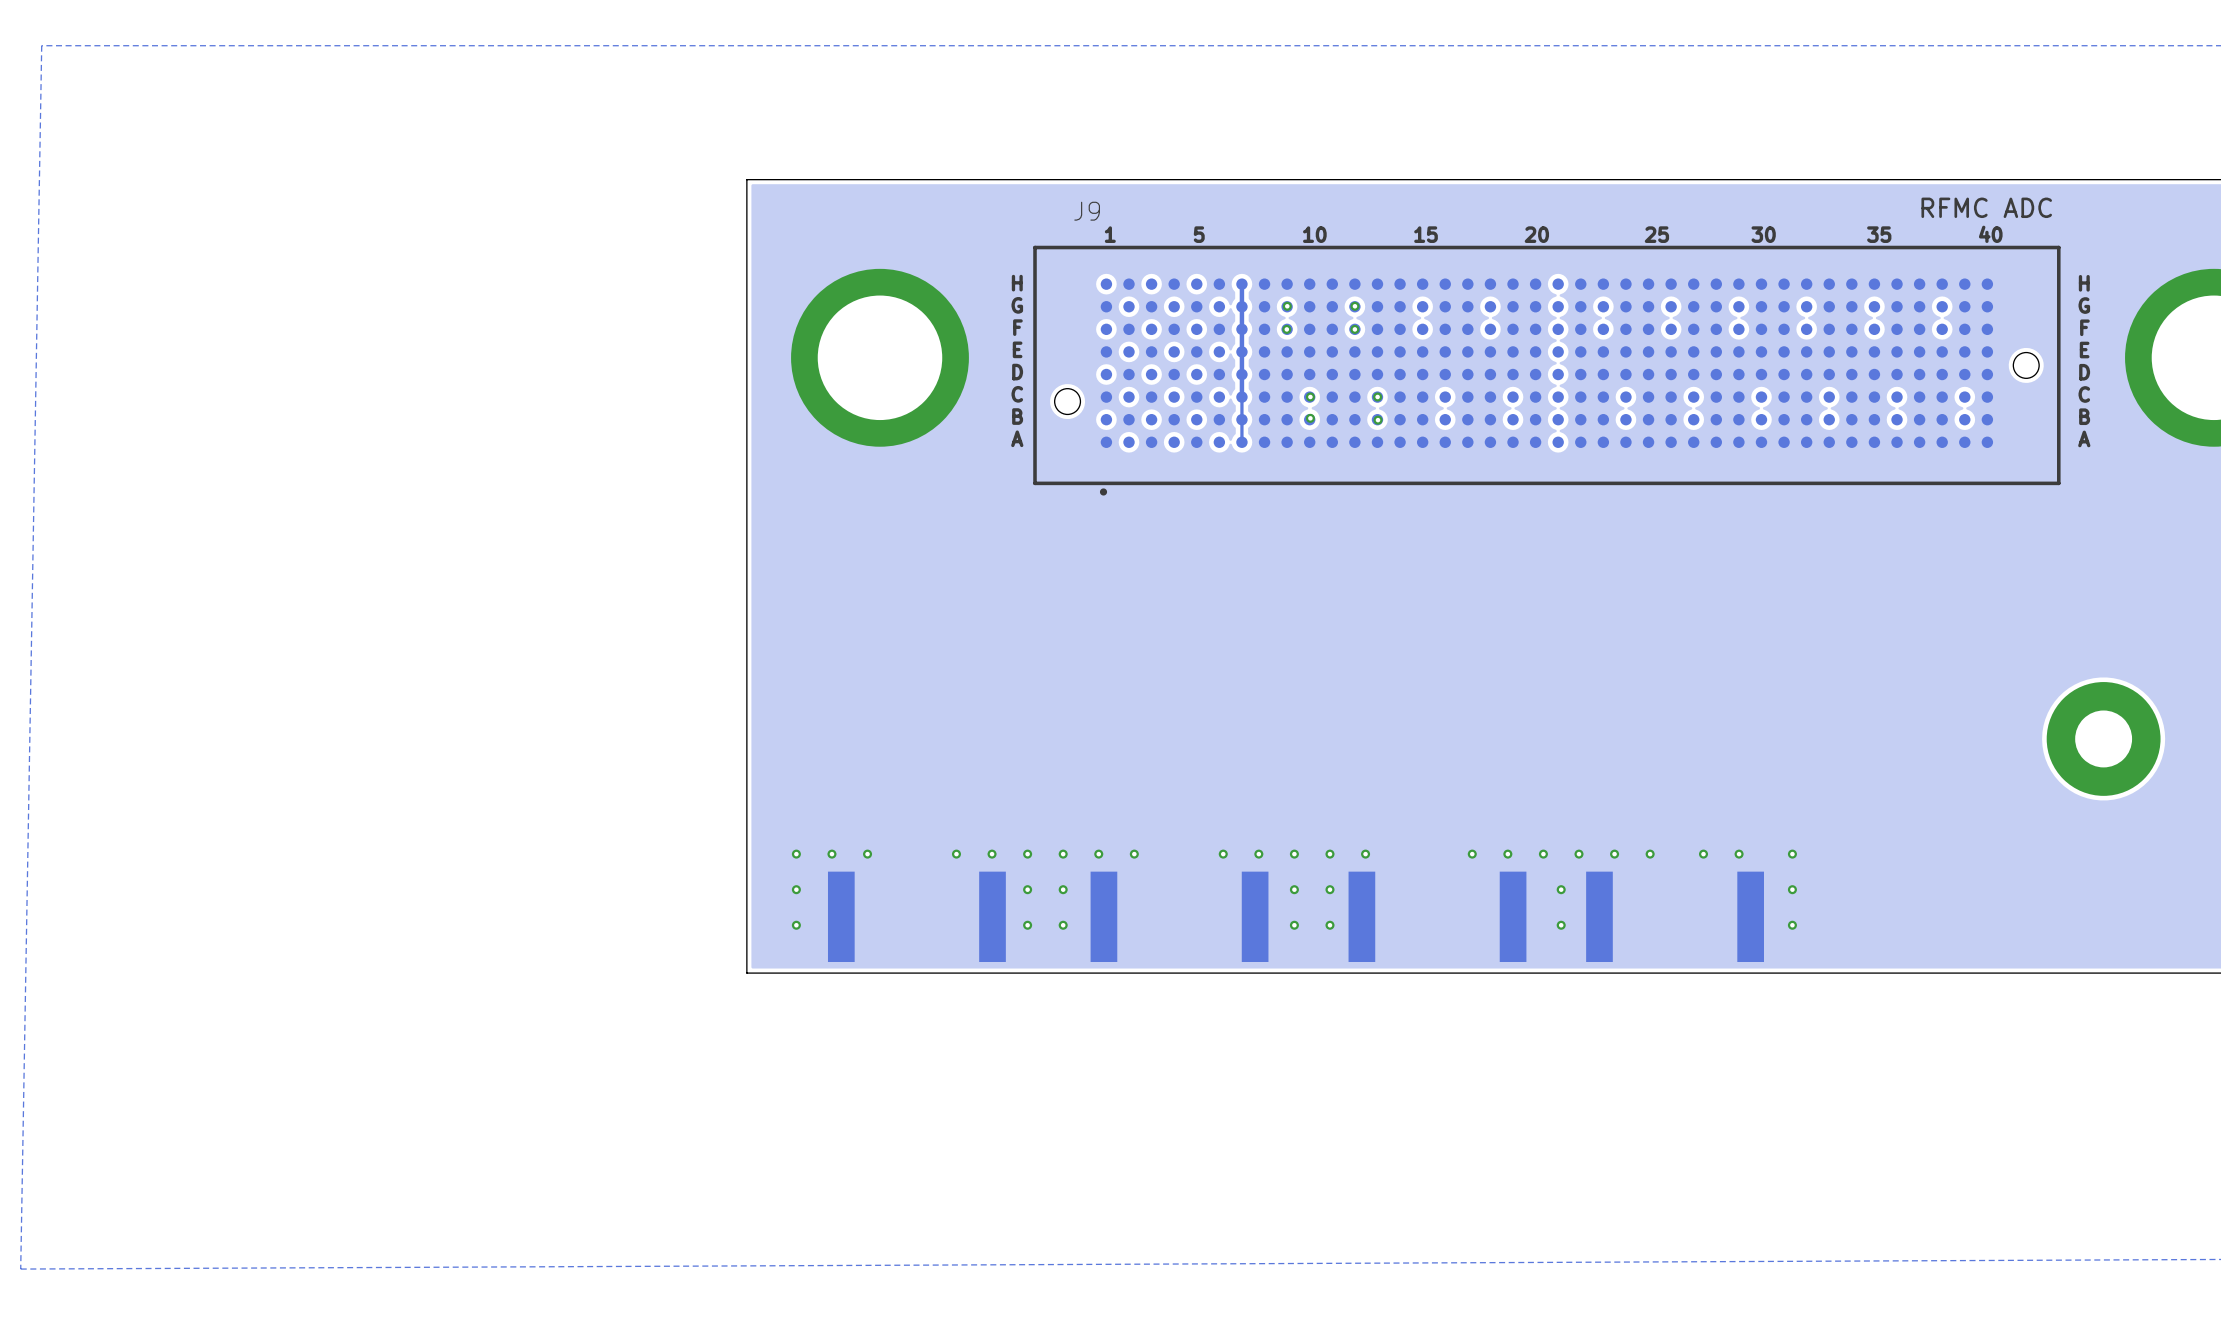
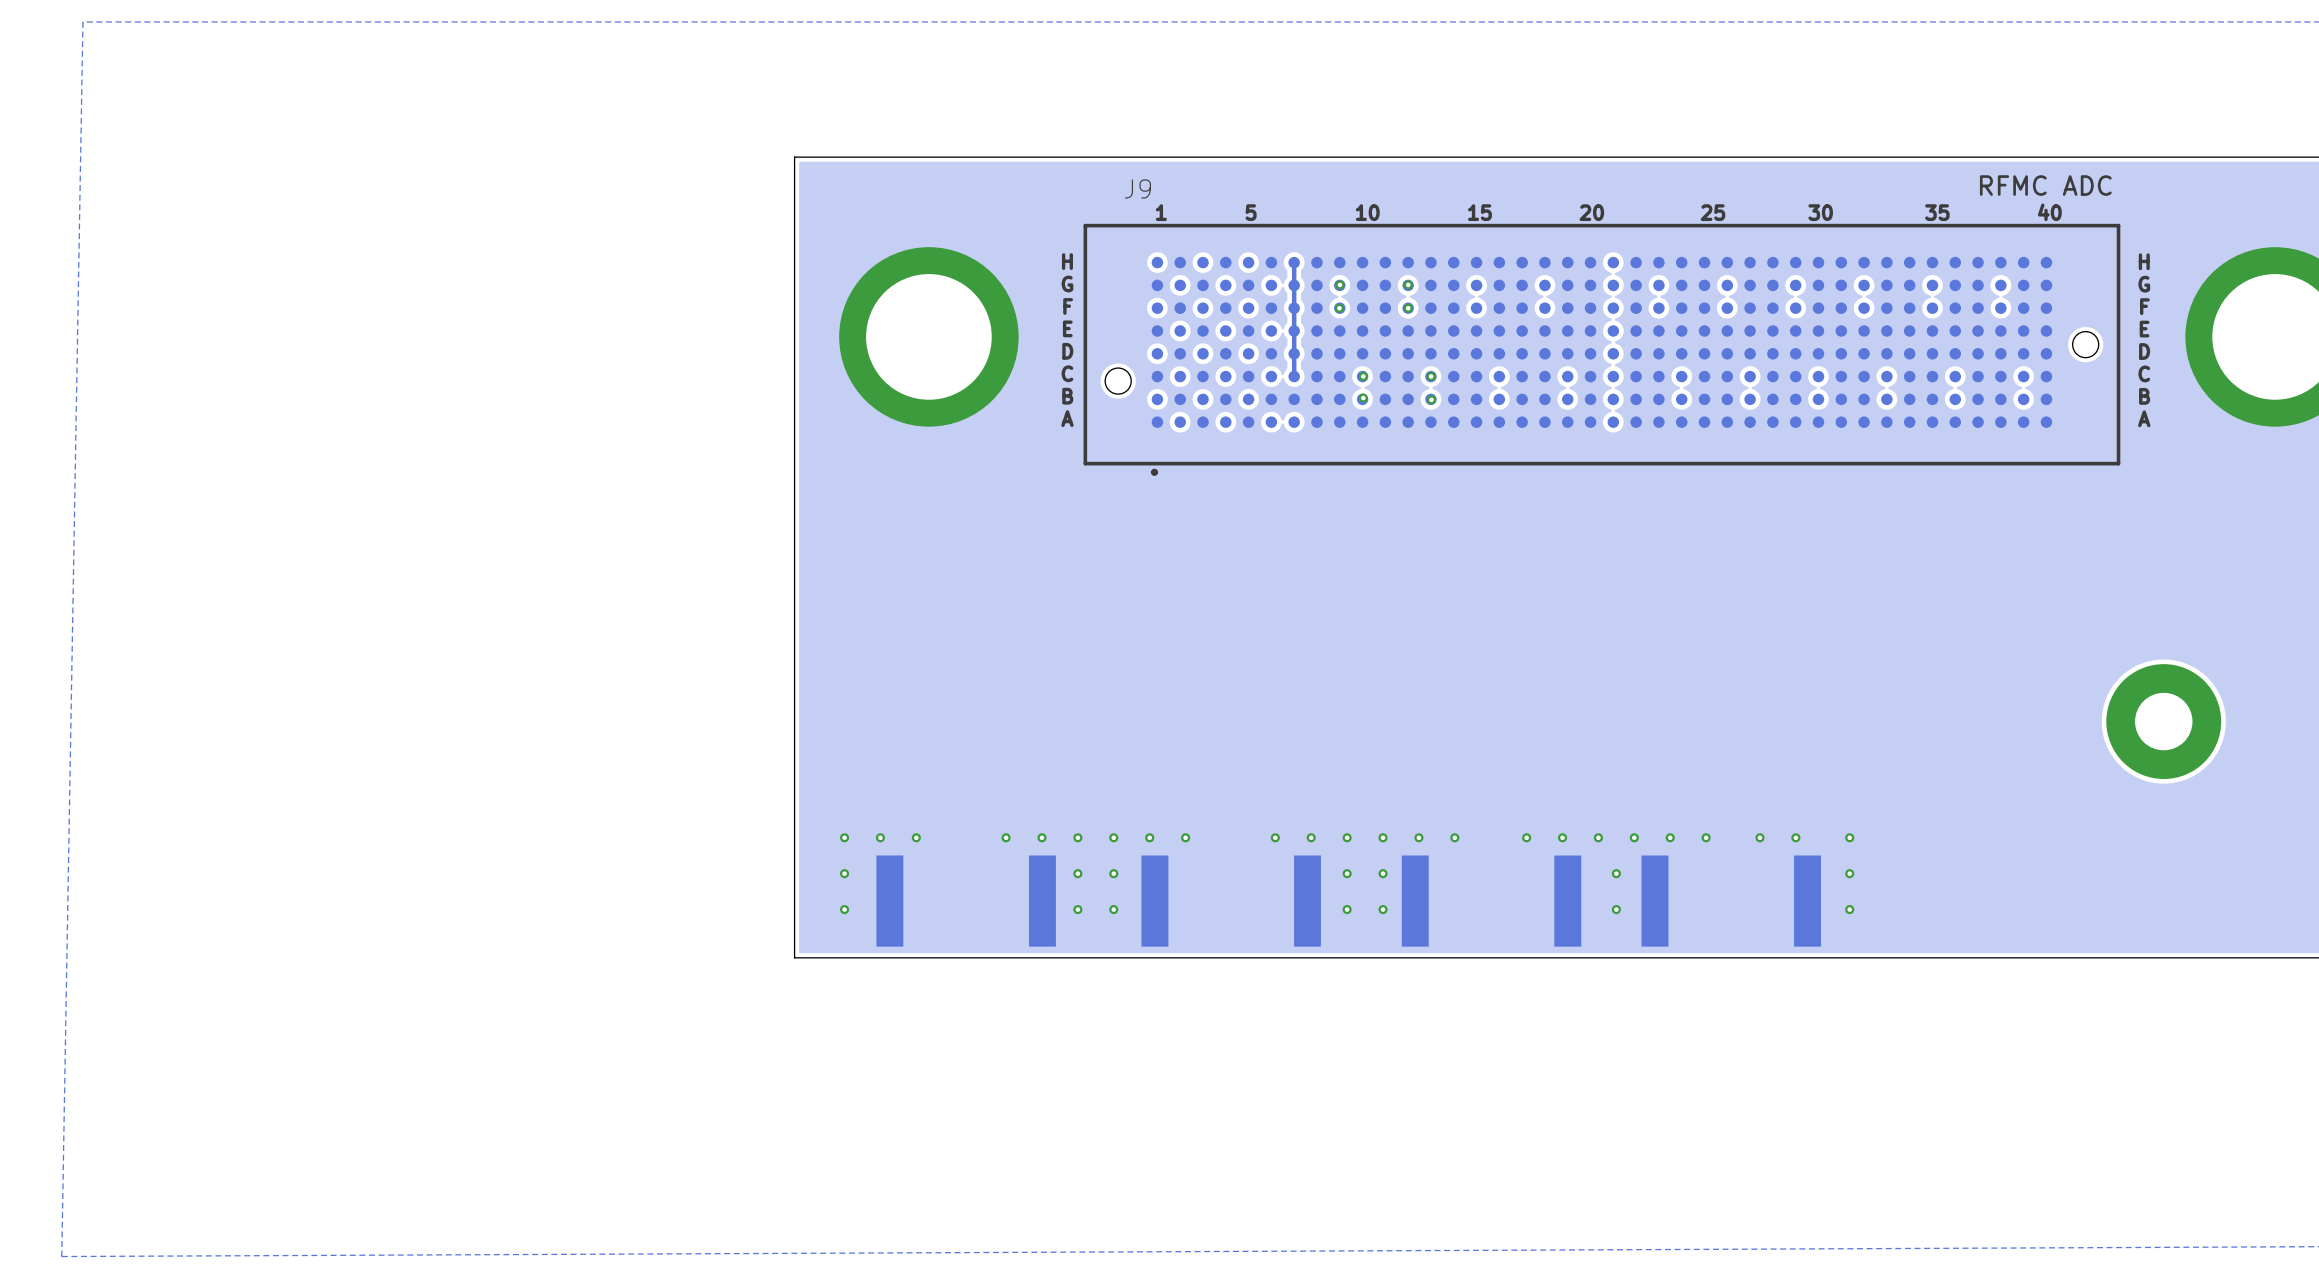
track: (1241, 397) (1241, 442) -> none
via: none -> (1454, 837)

